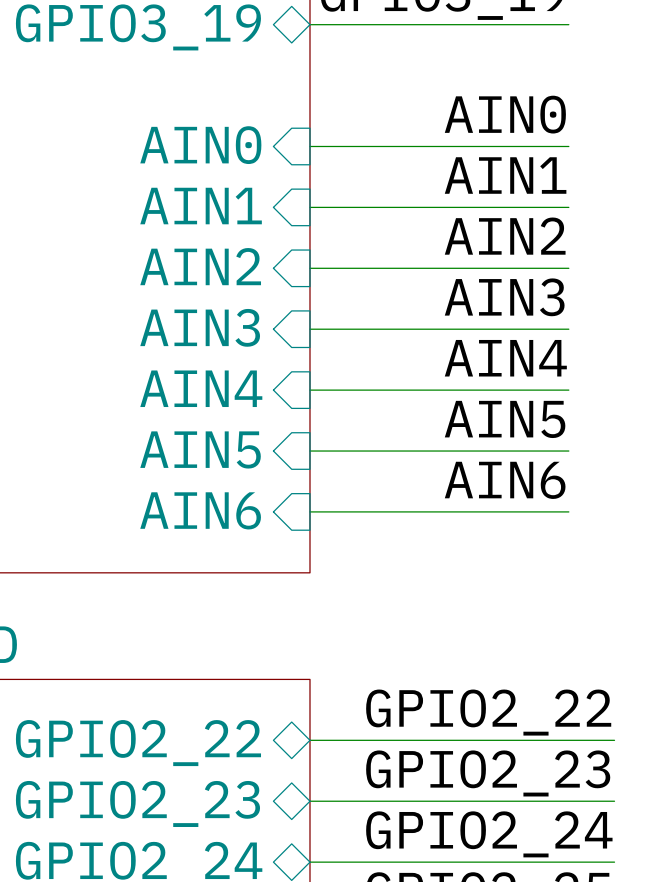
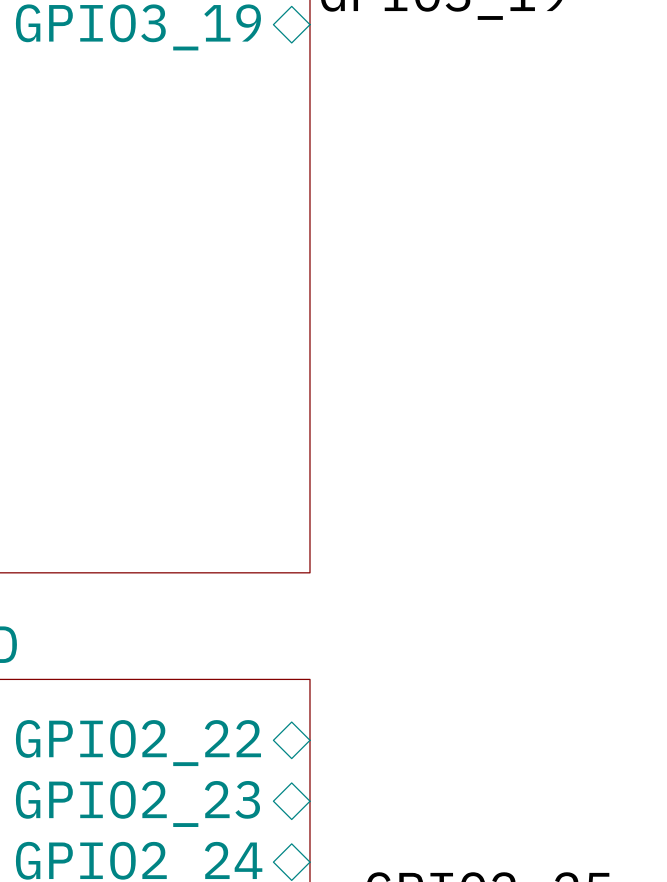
wire: (309, 24) (568, 24) -> none
label: AIN0 (505, 114) -> none
sheet pin: AIN0 (200, 145) -> none
wire: (309, 146) (568, 146) -> none
label: AIN1 (505, 175) -> none
sheet pin: AIN1 (201, 206) -> none
wire: (309, 207) (568, 207) -> none
label: AIN2 (505, 236) -> none
sheet pin: AIN2 (200, 266) -> none
wire: (309, 268) (568, 268) -> none
label: AIN3 (504, 297) -> none
sheet pin: AIN3 (200, 327) -> none
wire: (309, 329) (568, 329) -> none
label: AIN4 (505, 358) -> none
sheet pin: AIN4 (201, 388) -> none
wire: (309, 390) (568, 390) -> none
label: AIN5 (505, 419) -> none
sheet pin: AIN5 (200, 449) -> none
wire: (309, 451) (568, 451) -> none
label: AIN6 (505, 480) -> none
sheet pin: AIN6 (200, 510) -> none
wire: (309, 511) (568, 511) -> none
label: GPIO2_22 (488, 712) -> none
wire: (309, 740) (614, 740) -> none
label: GPIO2_23 (488, 773) -> none
wire: (309, 801) (614, 801) -> none
label: GPIO2_24 (489, 834) -> none
wire: (309, 862) (614, 862) -> none

